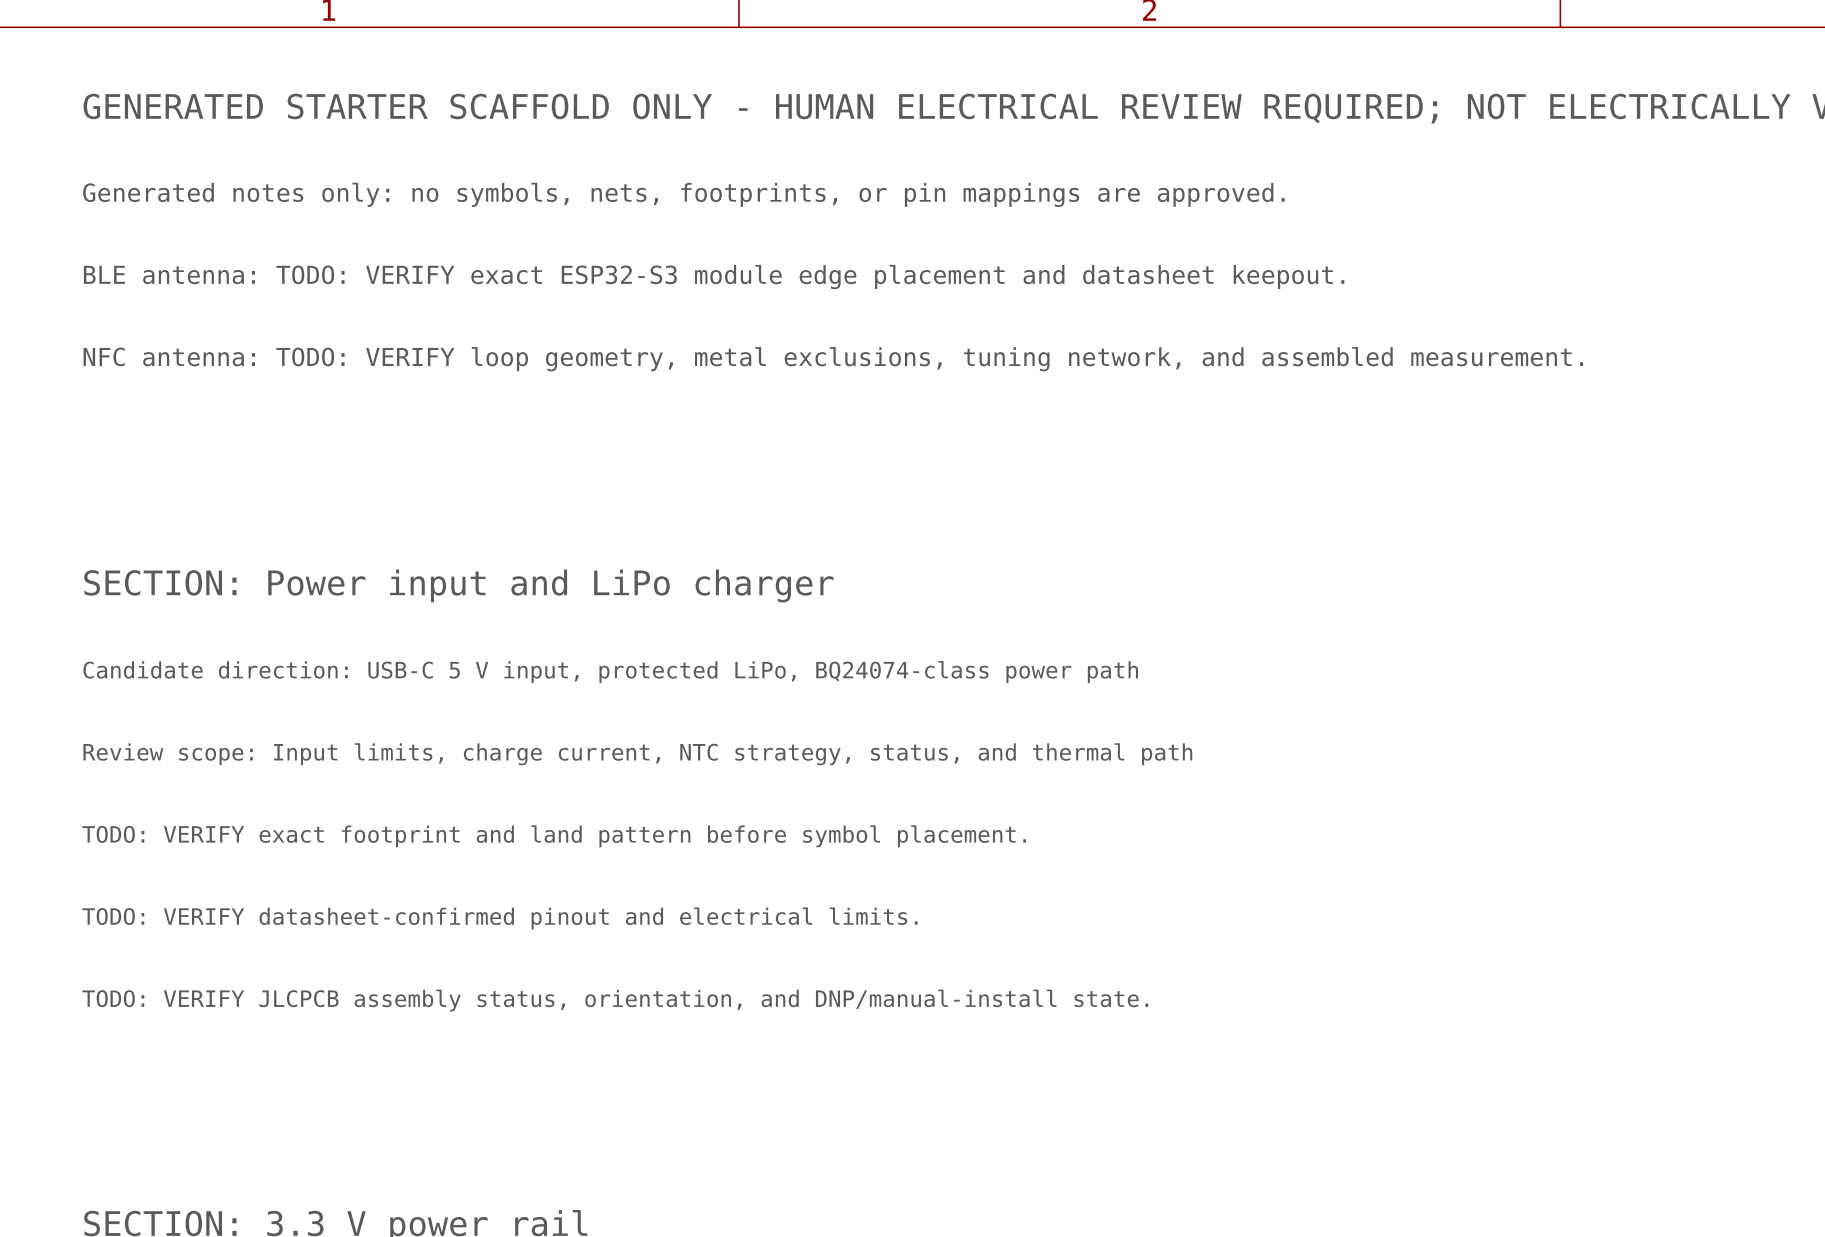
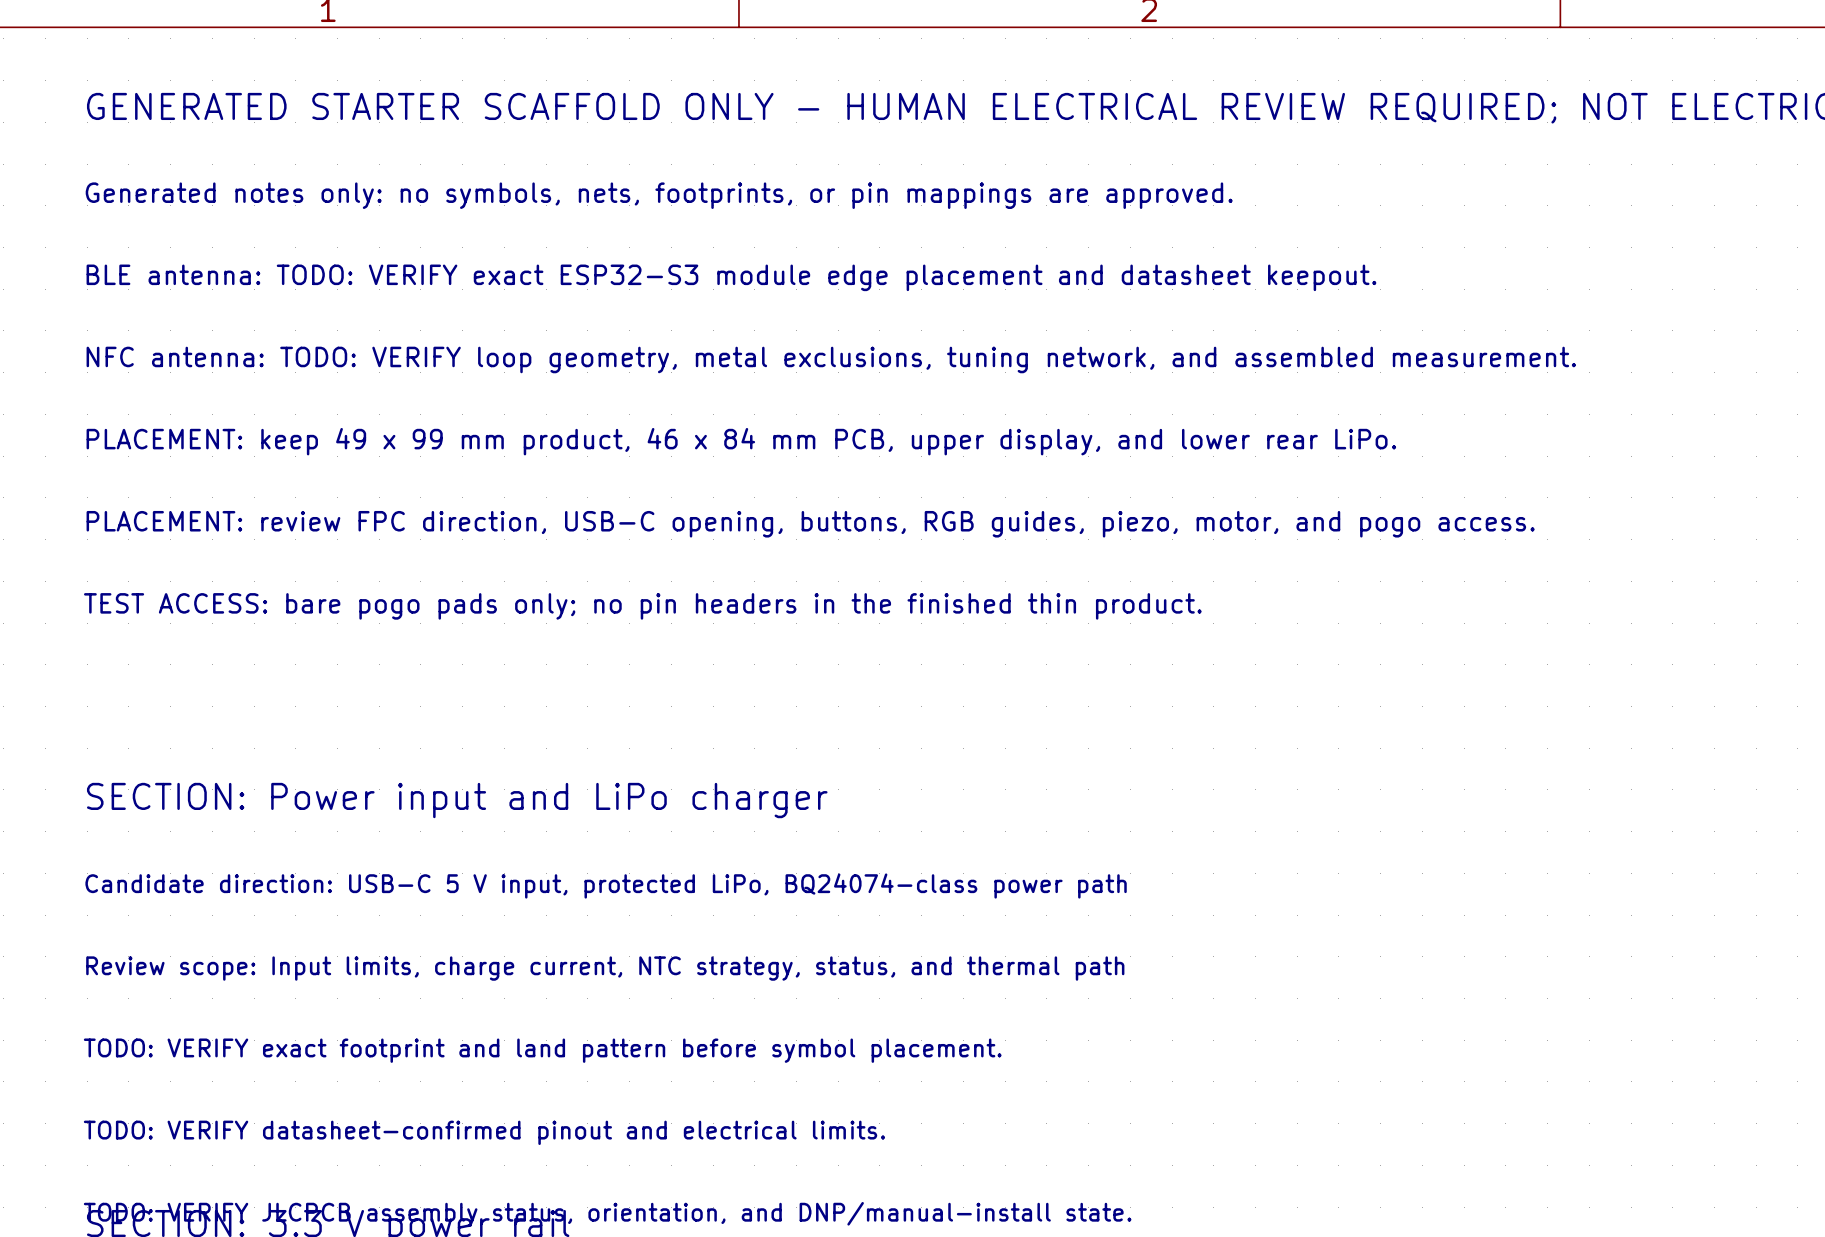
text: none -> PLACEMENT: keep 49 x 99 mm product, 46 x 84 mm PCB, upper display, and lower rear LiPo. (741, 441)
text: none -> PLACEMENT: review FPC direction, USB-C opening, buttons, RGB guides, piezo, motor, and pogo access. (810, 524)
text position: SECTION: Power input and LiPo charger (458, 585) -> SECTION: Power input and LiPo charger (457, 800)
text: none -> TEST ACCESS: bare pogo pads only; no pin headers in the finished thin product. (642, 606)
text position: Candidate direction: USB-C 5 V input, protected LiPo, BQ24074-class power path (610, 672) -> Candidate direction: USB-C 5 V input, protected LiPo, BQ24074-class power path (606, 886)
text position: Review scope: Input limits, charge current, NTC strategy, status, and thermal path (637, 754) -> Review scope: Input limits, charge current, NTC strategy, status, and thermal path (605, 968)
text position: TODO: VERIFY exact footprint and land pattern before symbol placement. (554, 836) -> TODO: VERIFY exact footprint and land pattern before symbol placement. (542, 1050)
text position: TODO: VERIFY datasheet-confirmed pinout and electrical limits. (499, 918) -> TODO: VERIFY datasheet-confirmed pinout and electrical limits. (484, 1132)
text position: TODO: VERIFY JLCPCB assembly status, orientation, and DNP/manual-install state. (615, 1000) -> TODO: VERIFY JLCPCB assembly status, orientation, and DNP/manual-install state. (607, 1214)

